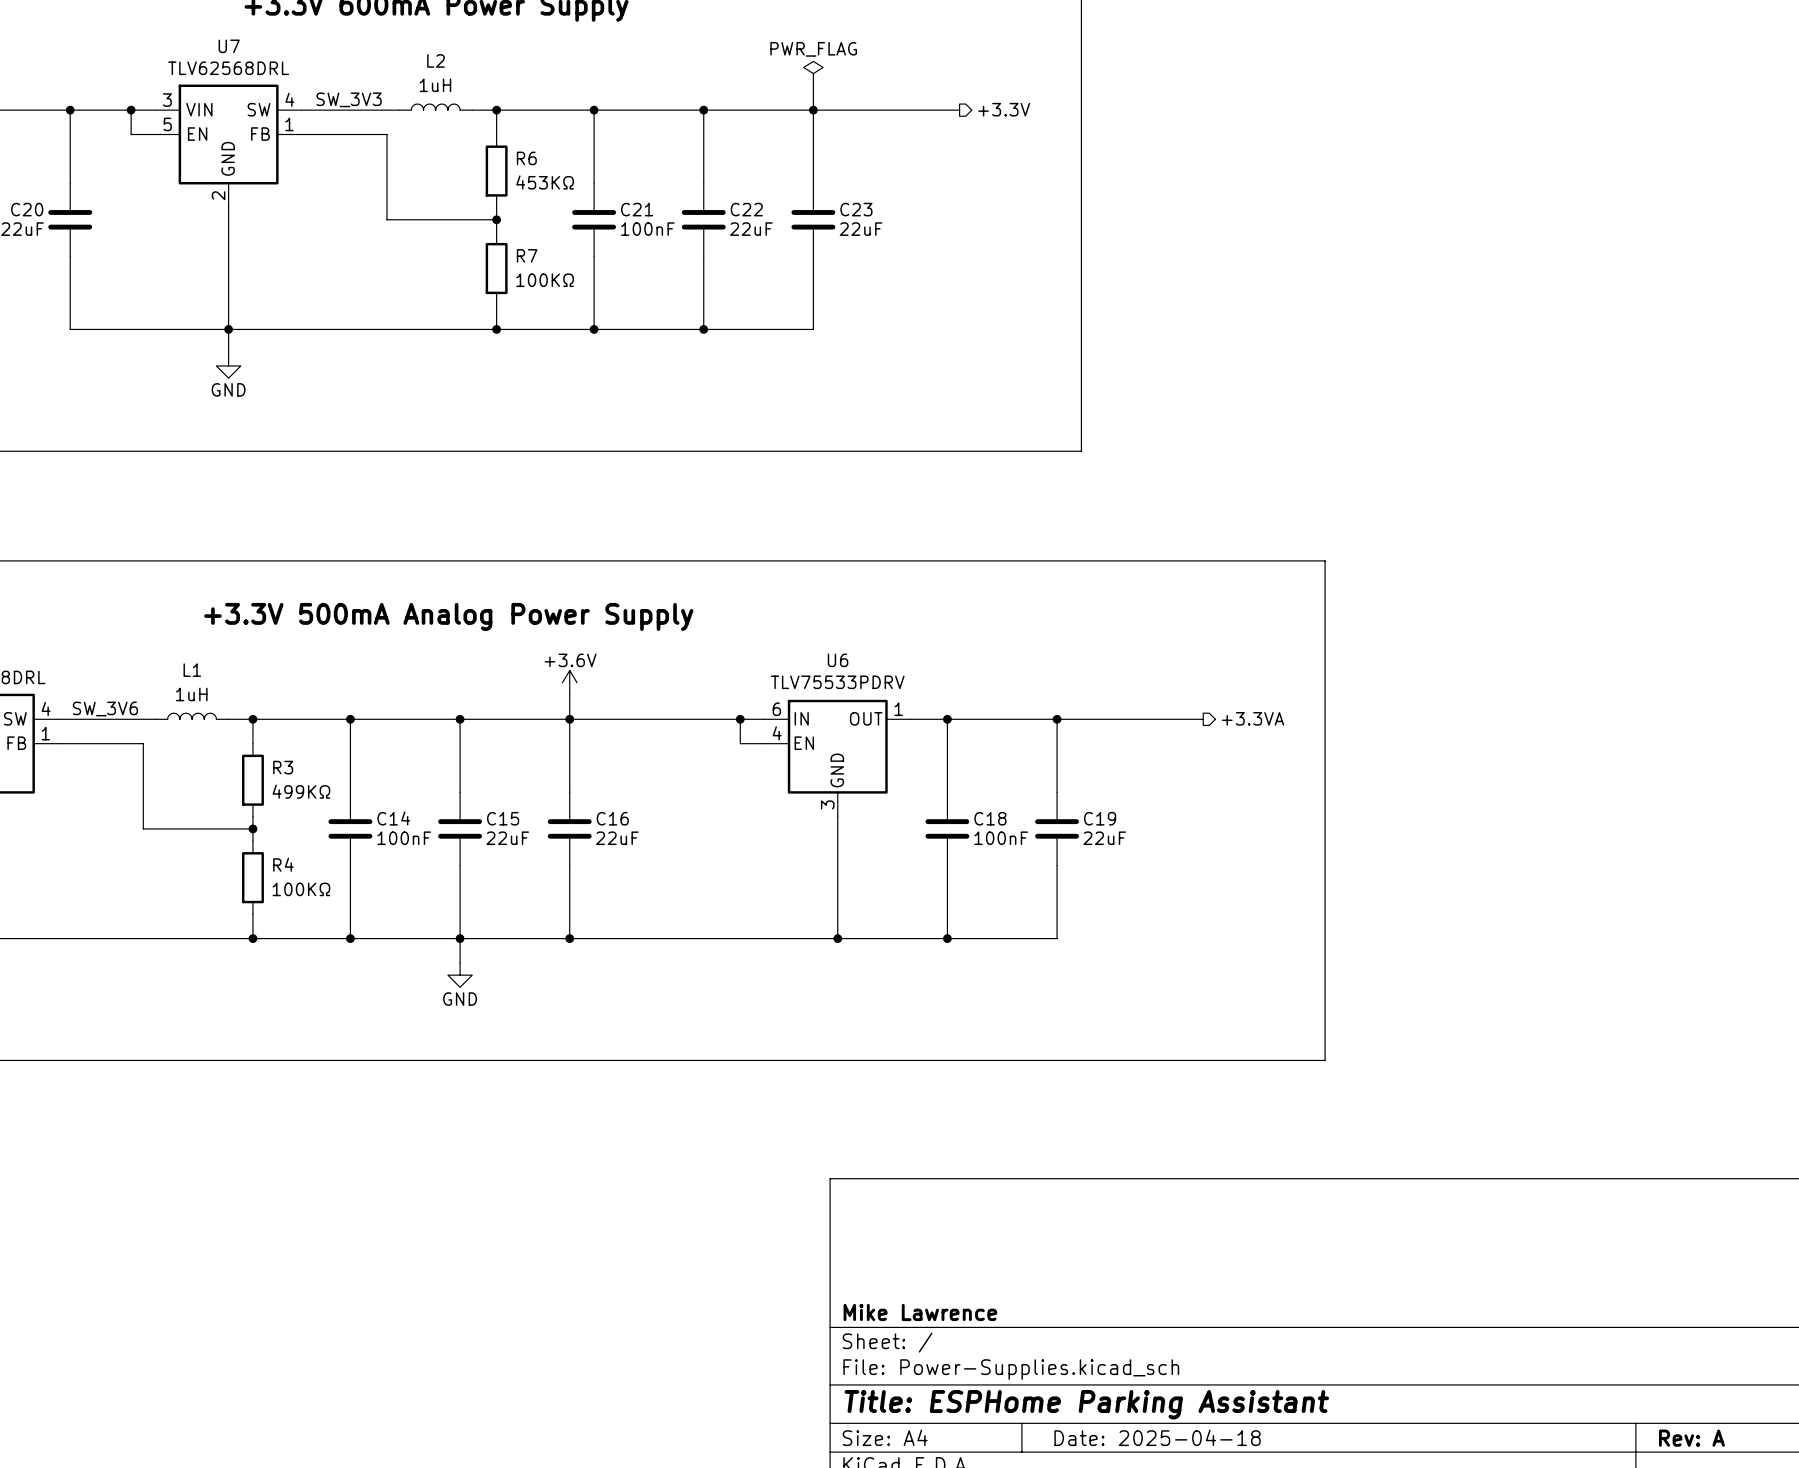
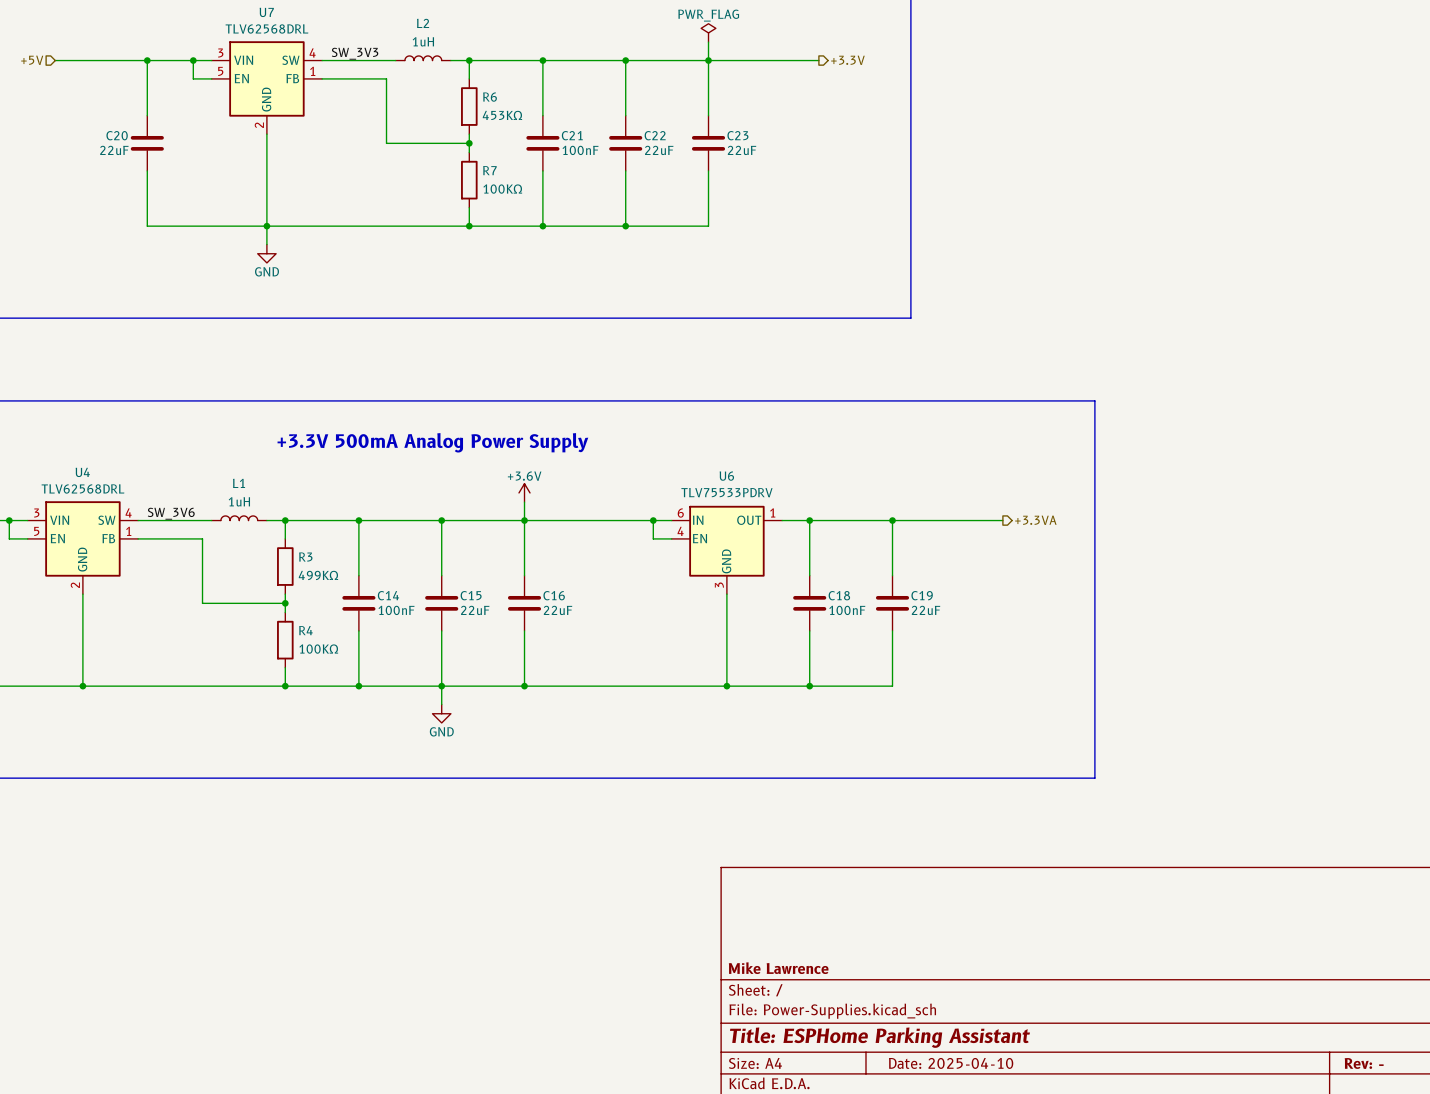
title block: Date: 2025-04-18 (1157, 1437) -> Date: 2025-04-10 (951, 1063)
title block: Rev: A (1691, 1438) -> Rev: - (1364, 1063)

